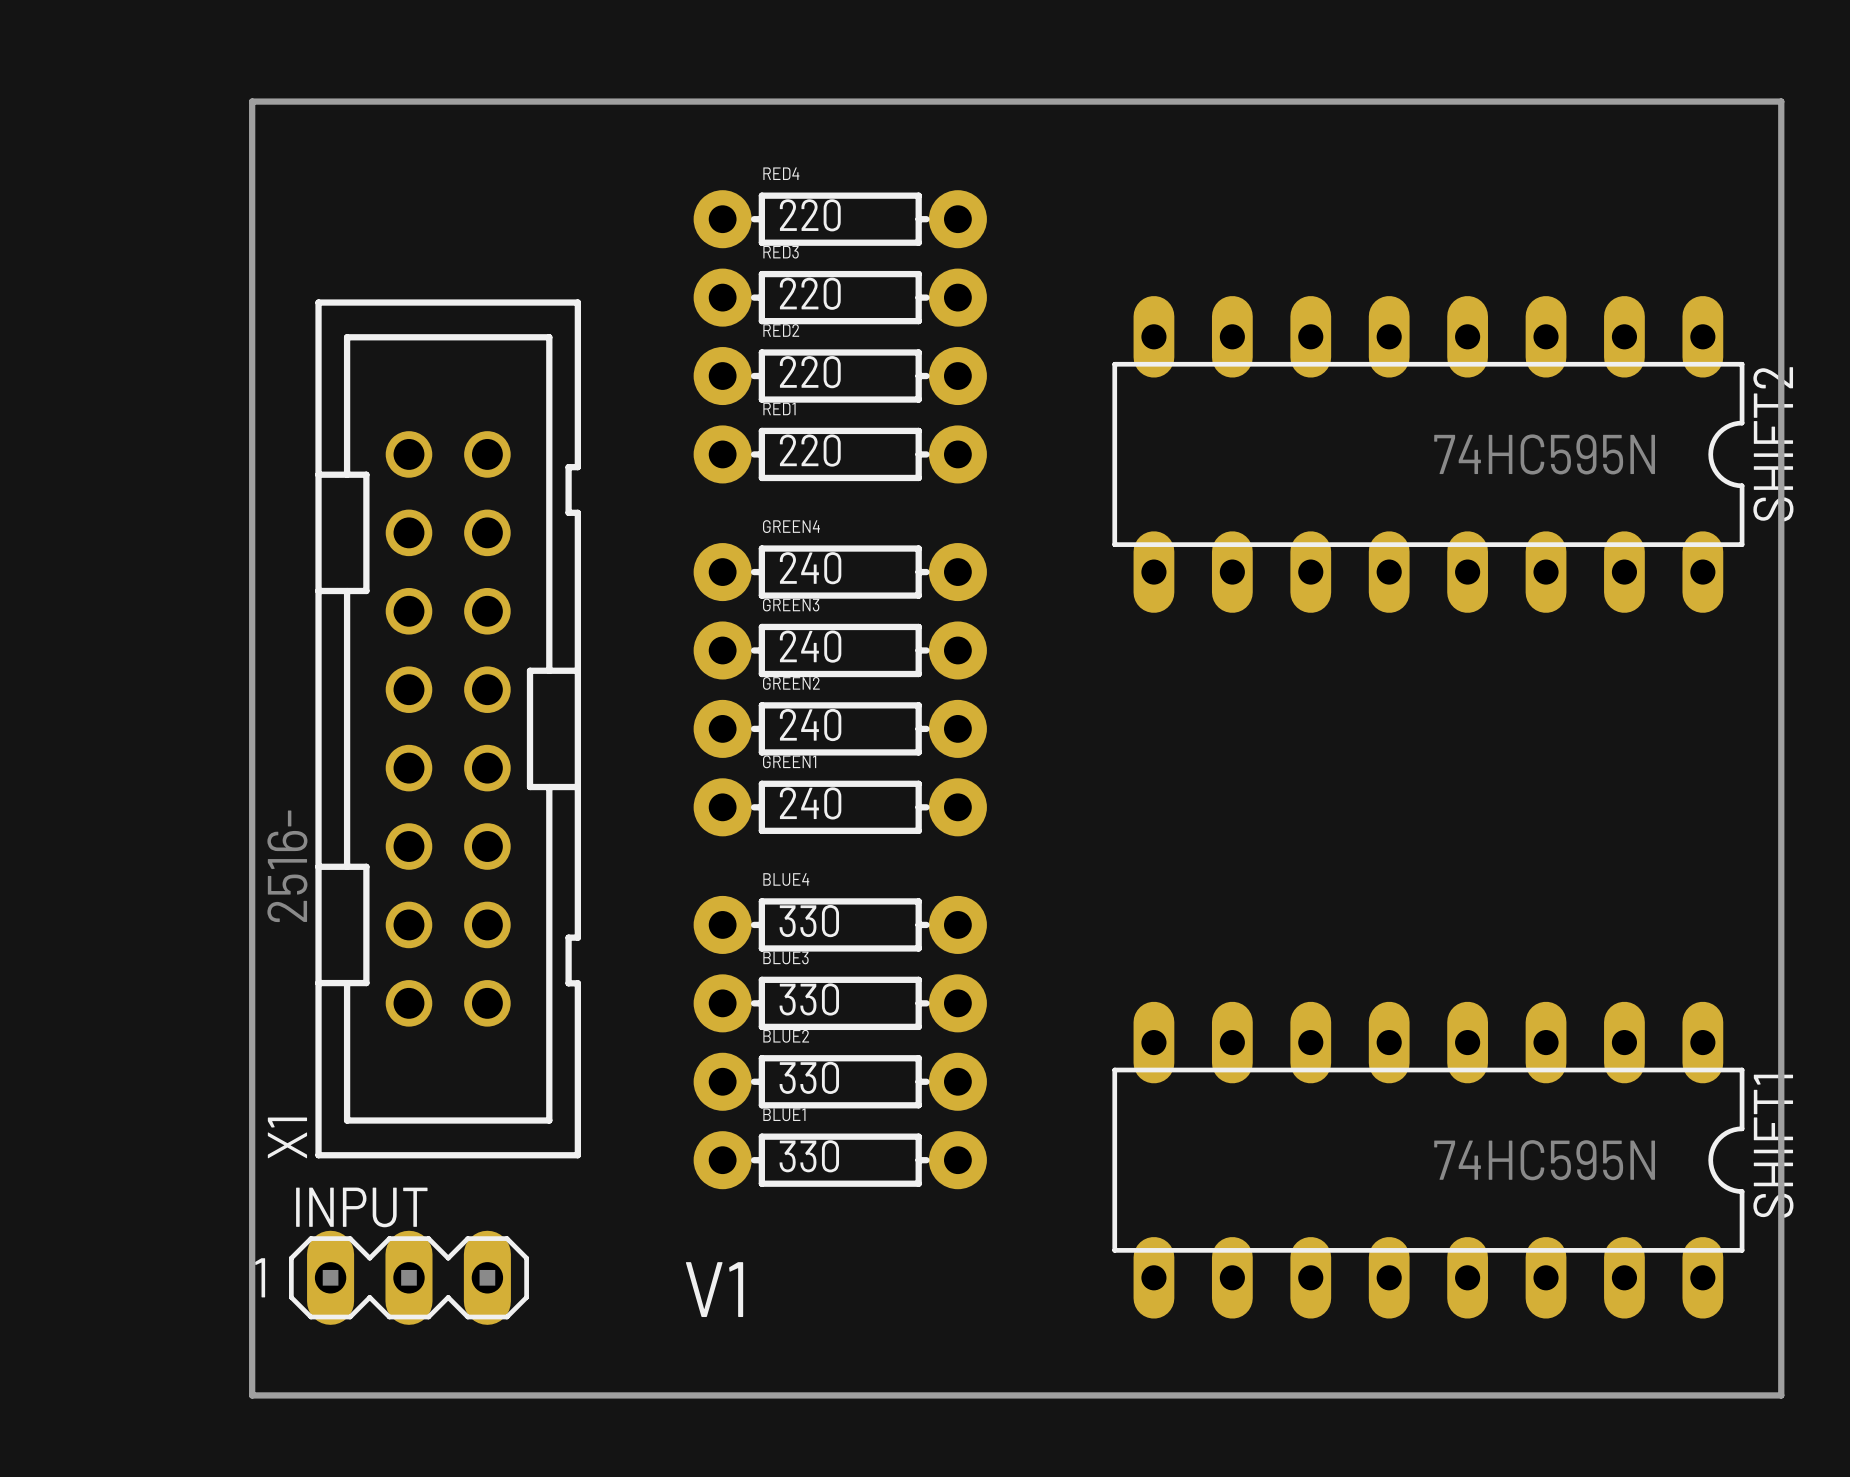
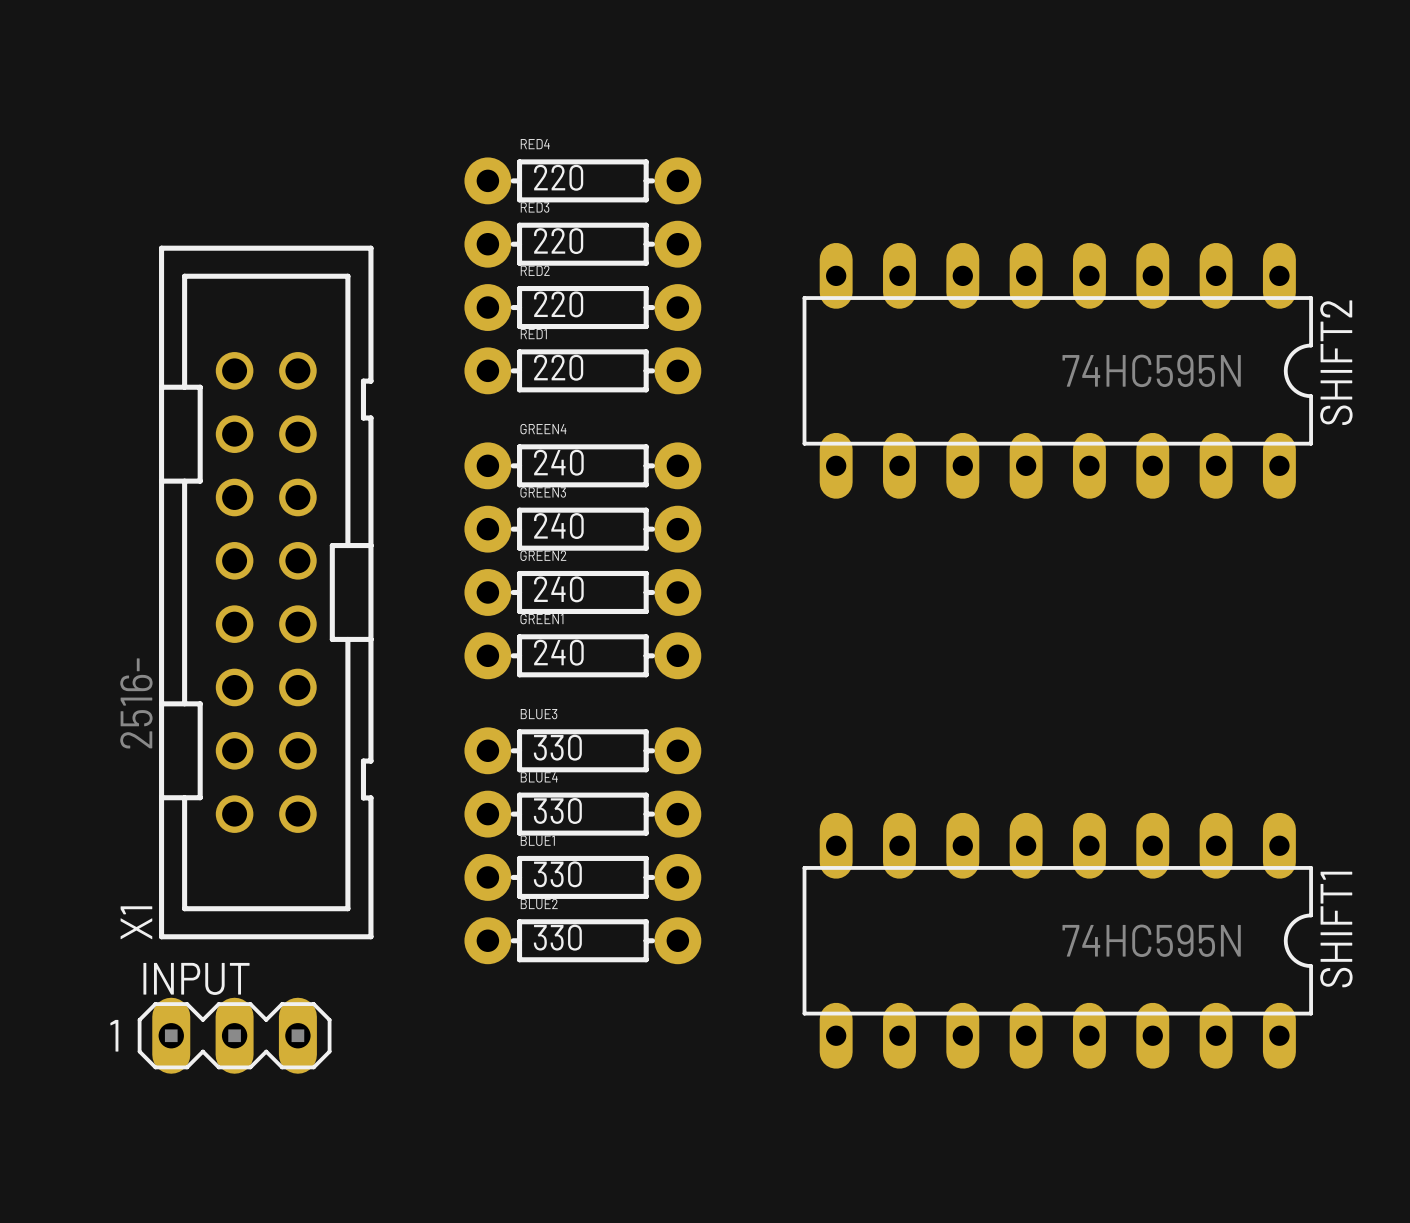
board edge: (252, 101) (252, 1395) (1781, 1395) (1781, 101) (252, 101) -> none
BLUE4 name: BLUE4 (786, 879) -> BLUE3 (539, 714)
BLUE3 name: BLUE3 (785, 957) -> BLUE4 (539, 777)
BLUE2 name: BLUE2 (786, 1036) -> BLUE1 (537, 840)
BLUE1 name: BLUE1 (784, 1114) -> BLUE2 (539, 904)
text: V1 (714, 1289) -> none

